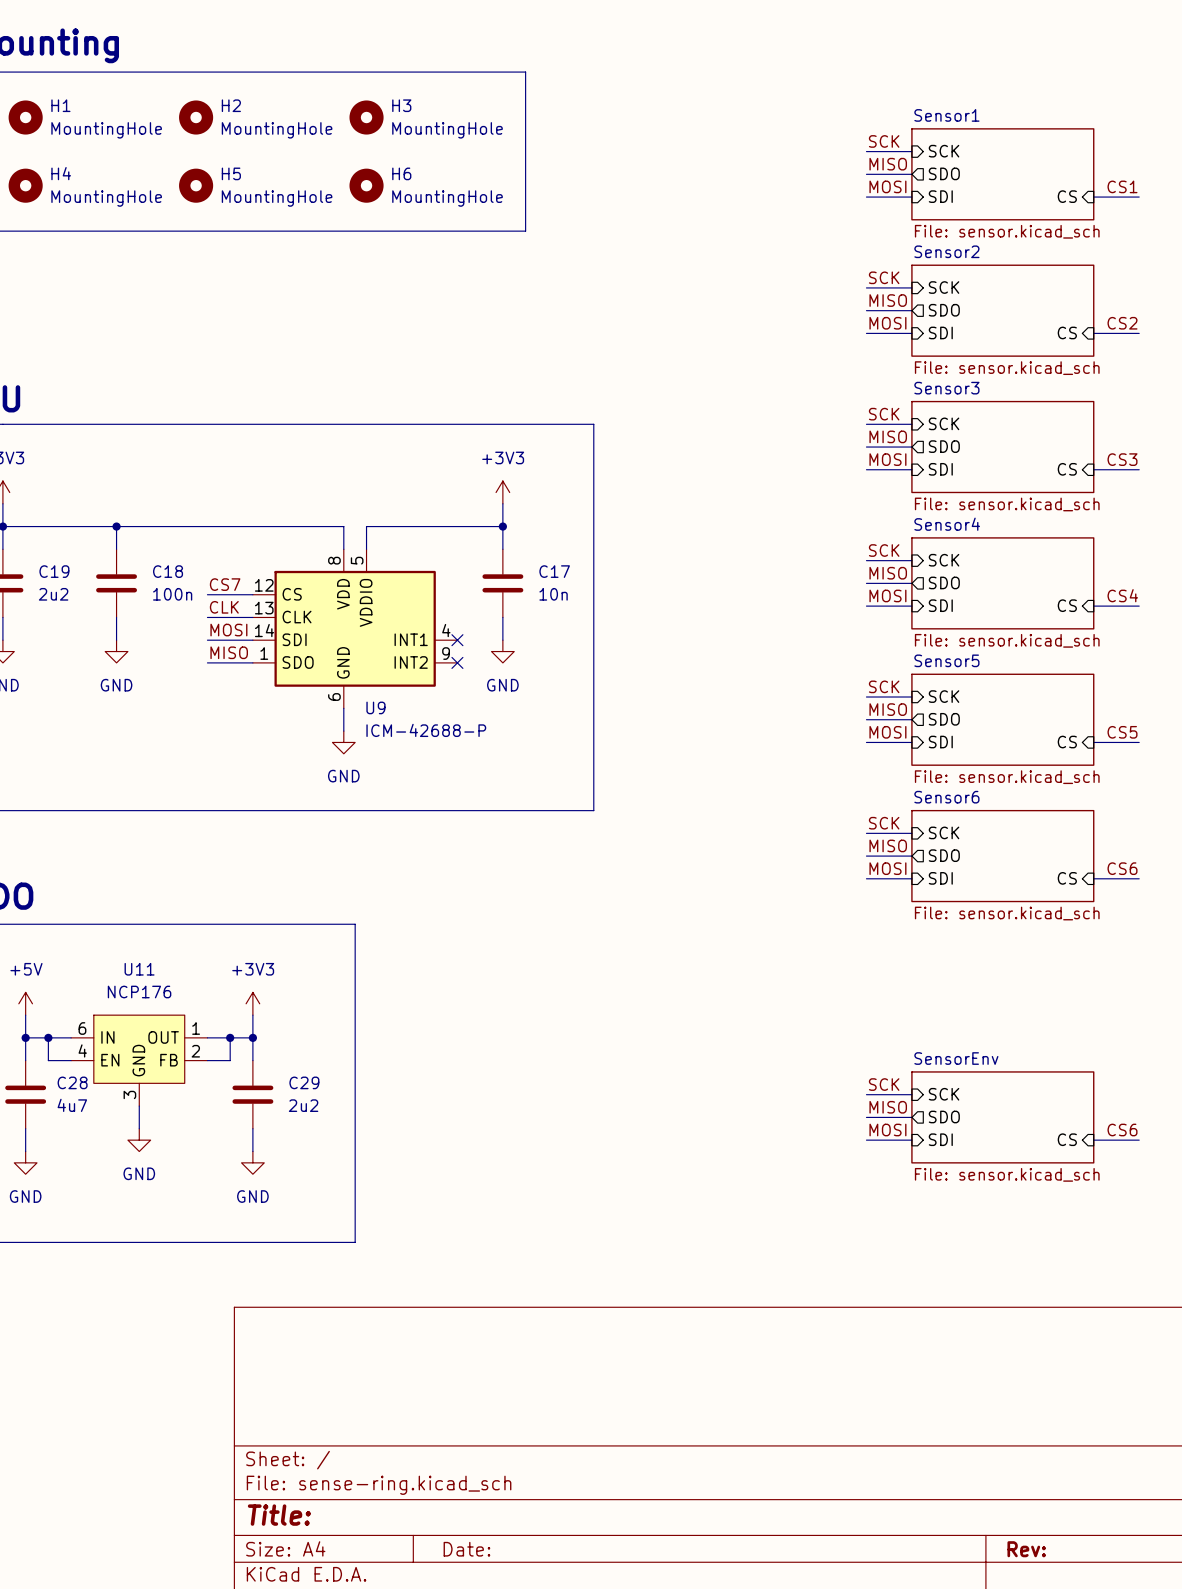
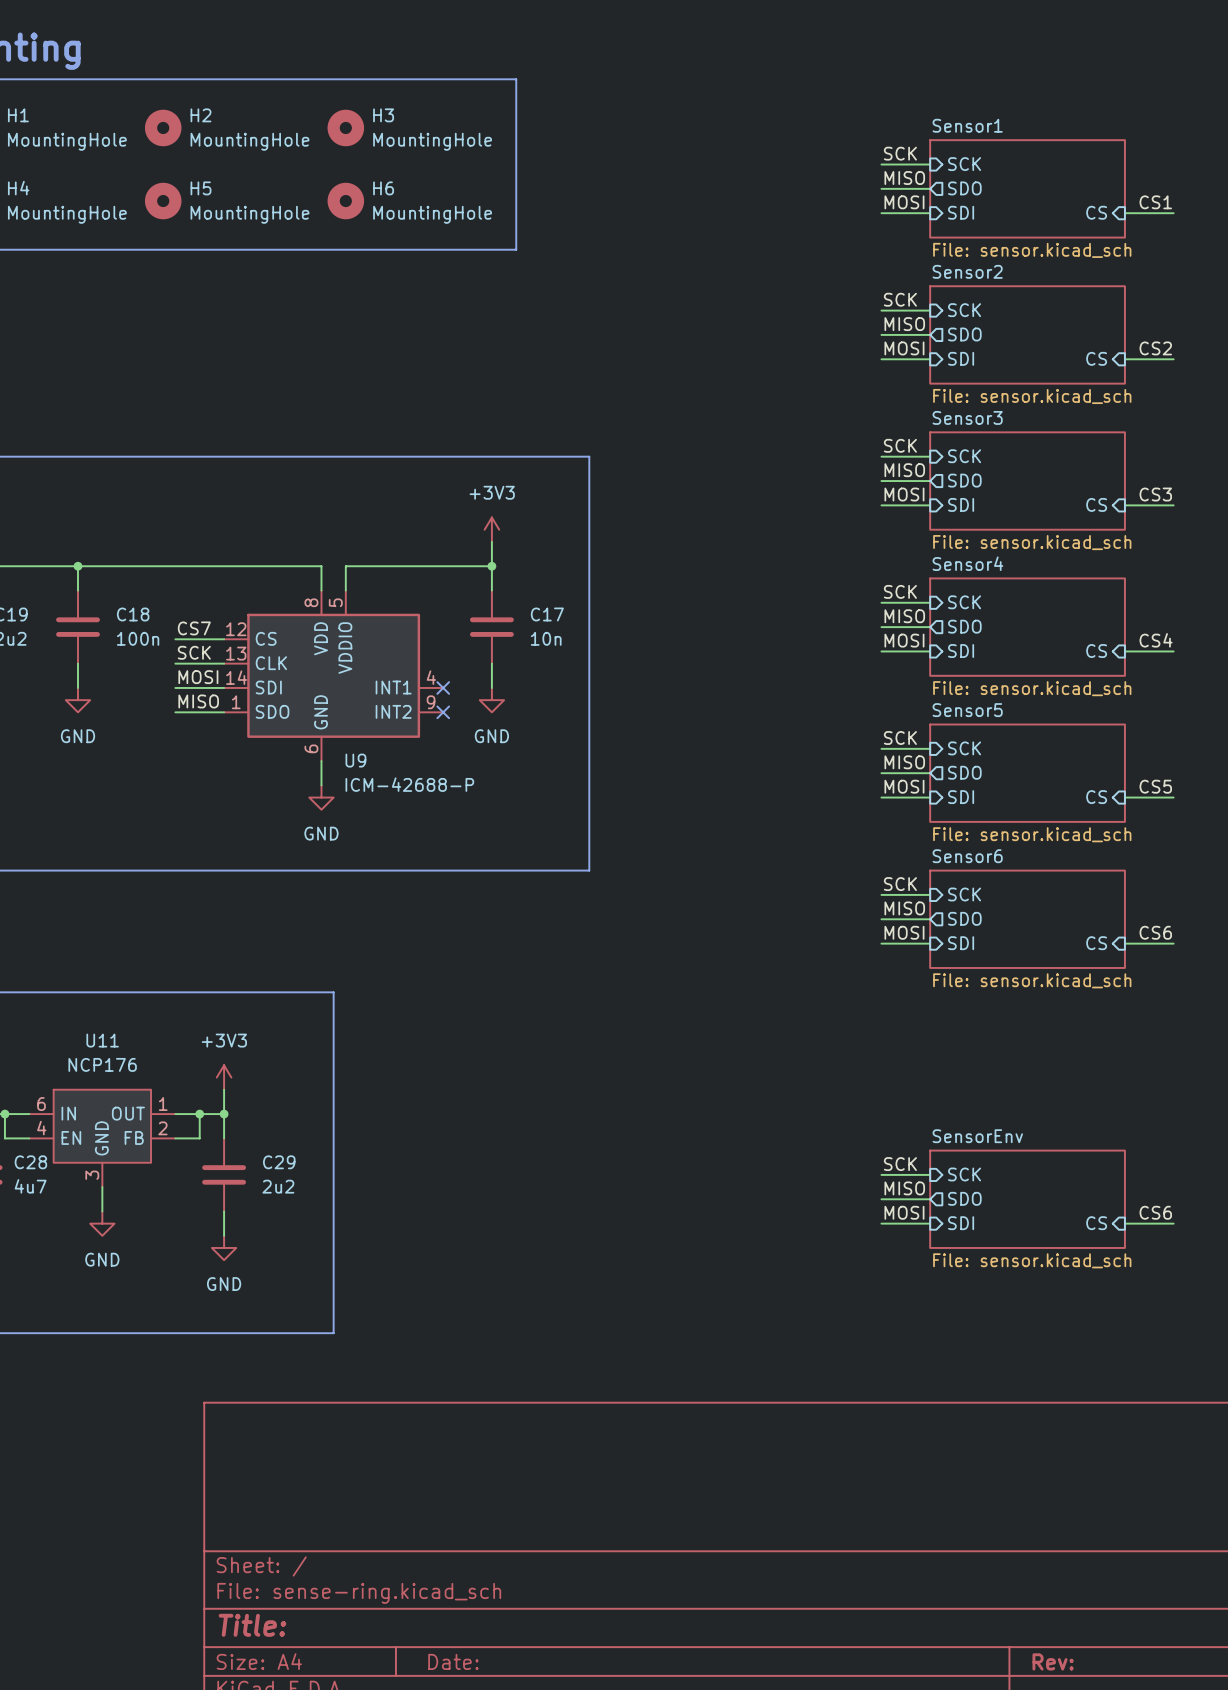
label: CLK (224, 607) -> SCK (194, 652)

